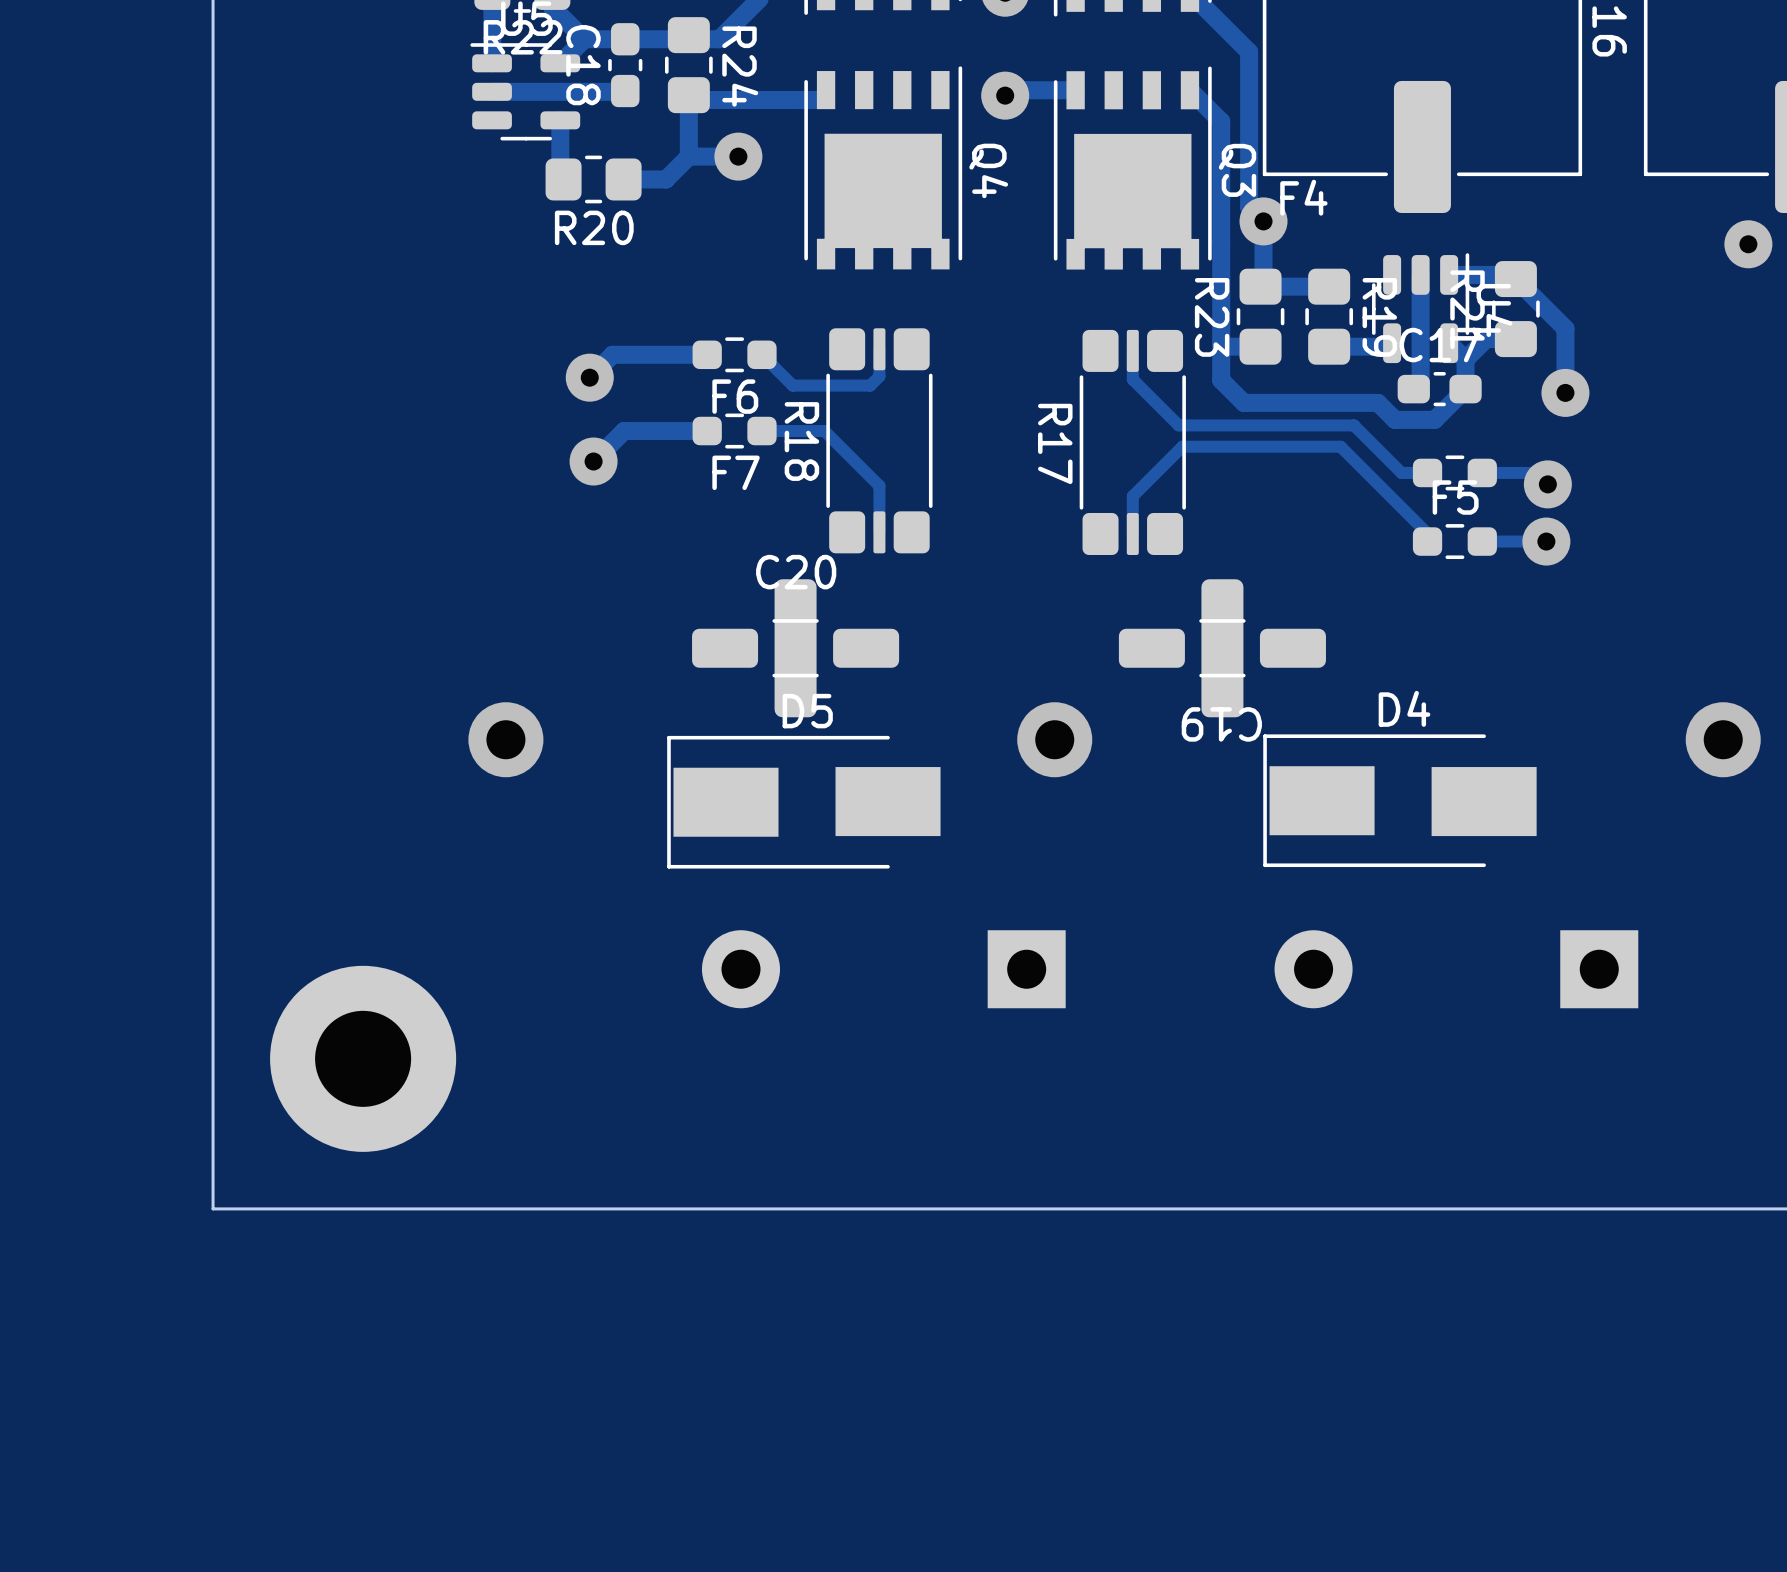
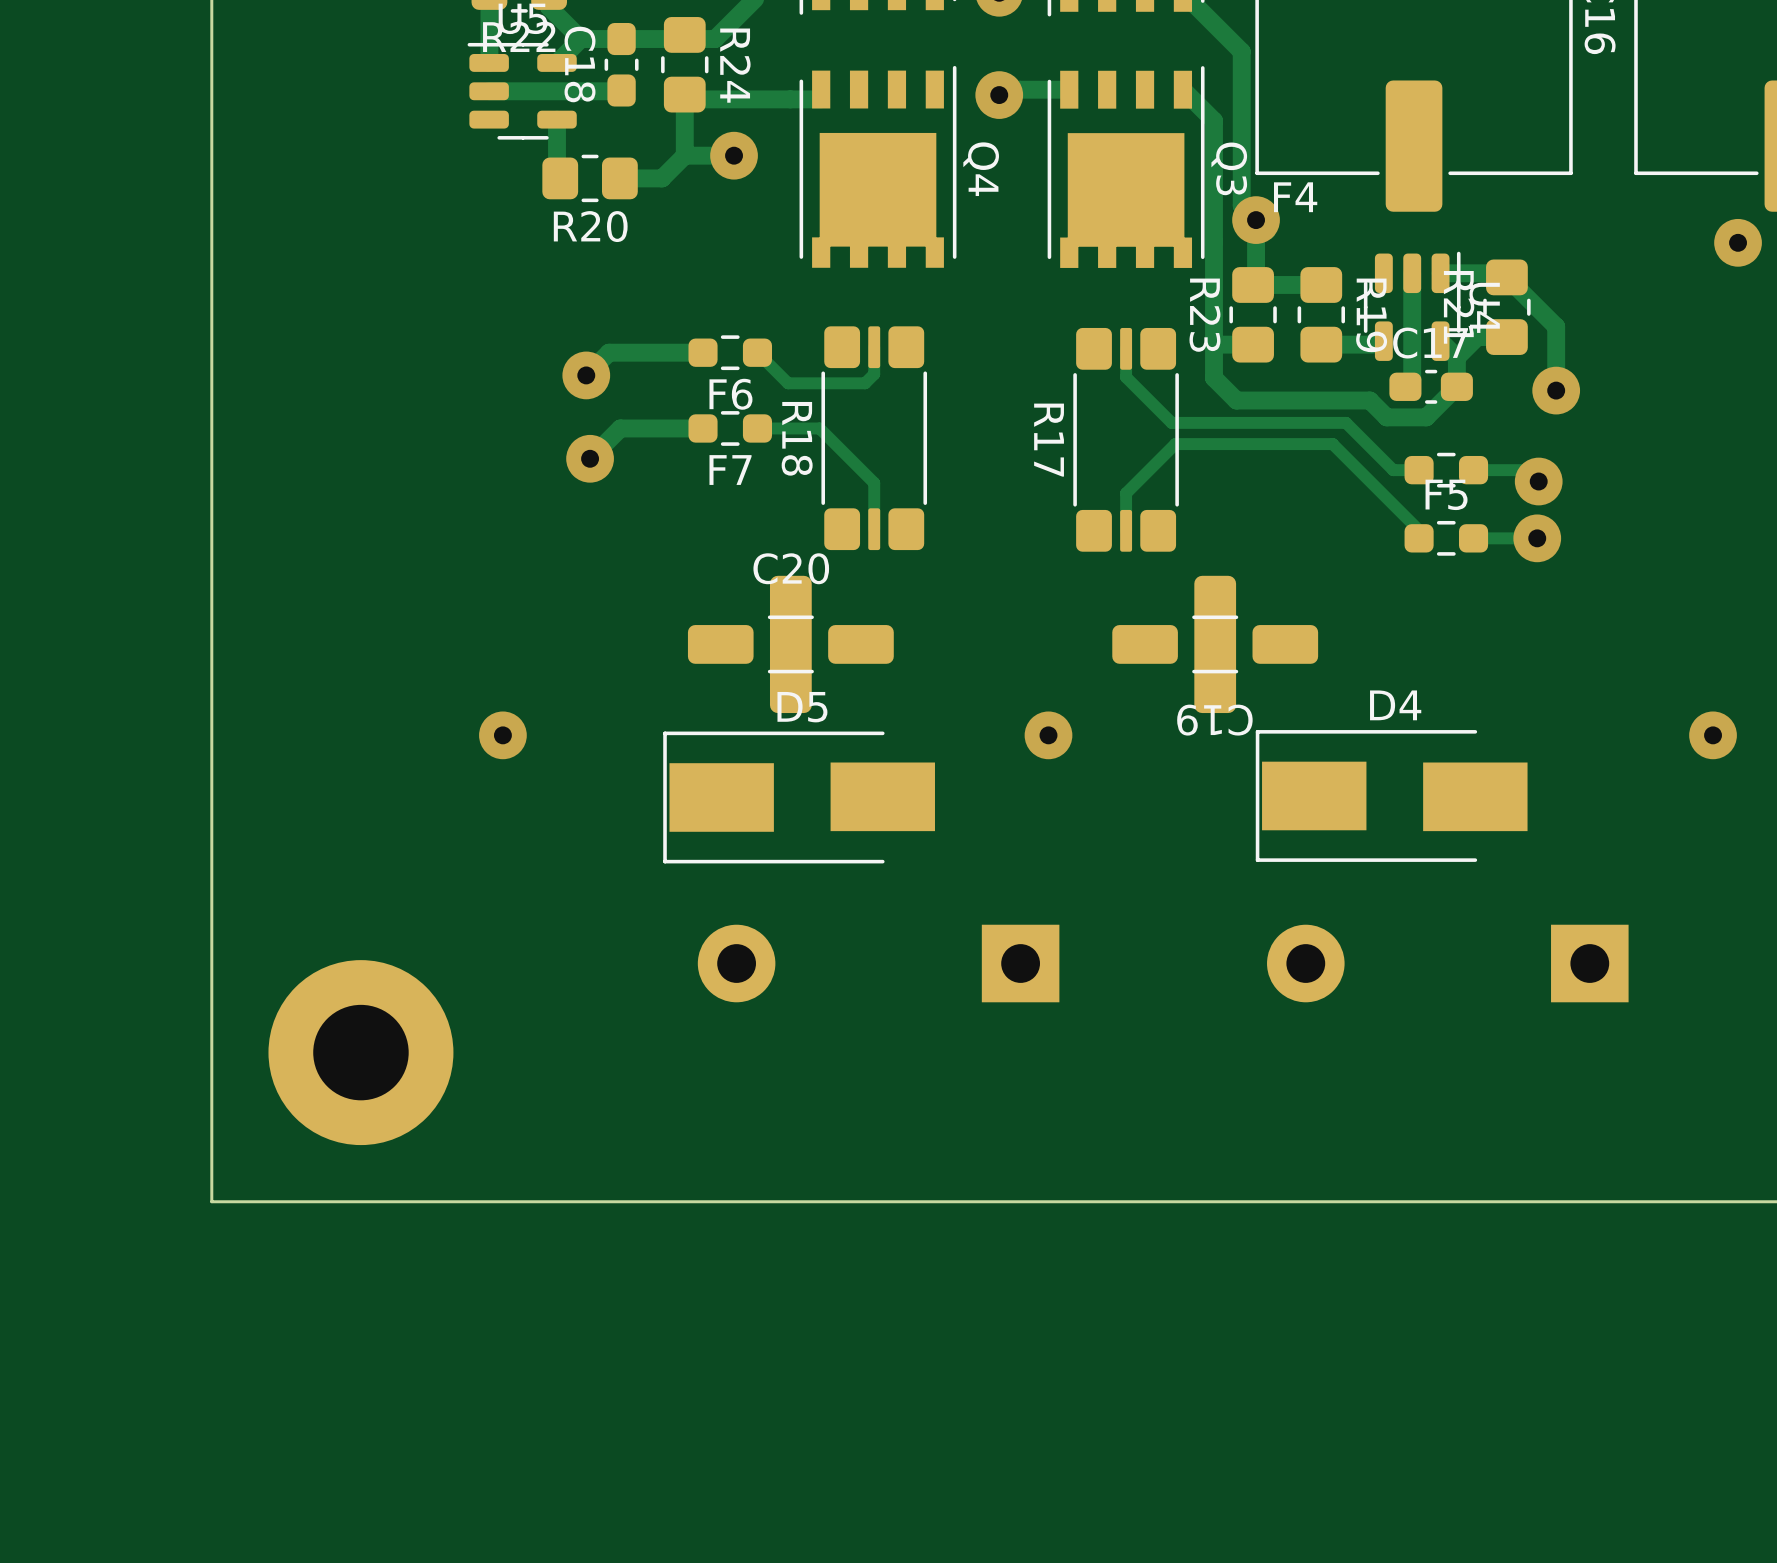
via size: [468, 702, 544, 778] -> [479, 711, 527, 760]
via size: [1017, 702, 1093, 778] -> [1024, 711, 1073, 760]
via size: [1685, 702, 1761, 778] -> [1689, 711, 1737, 760]

